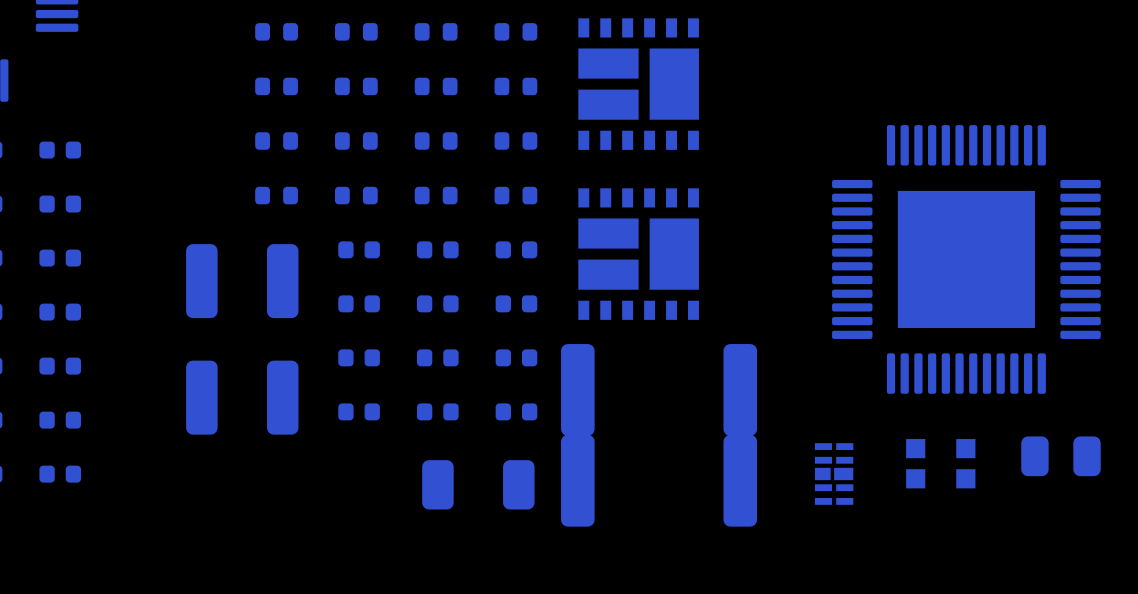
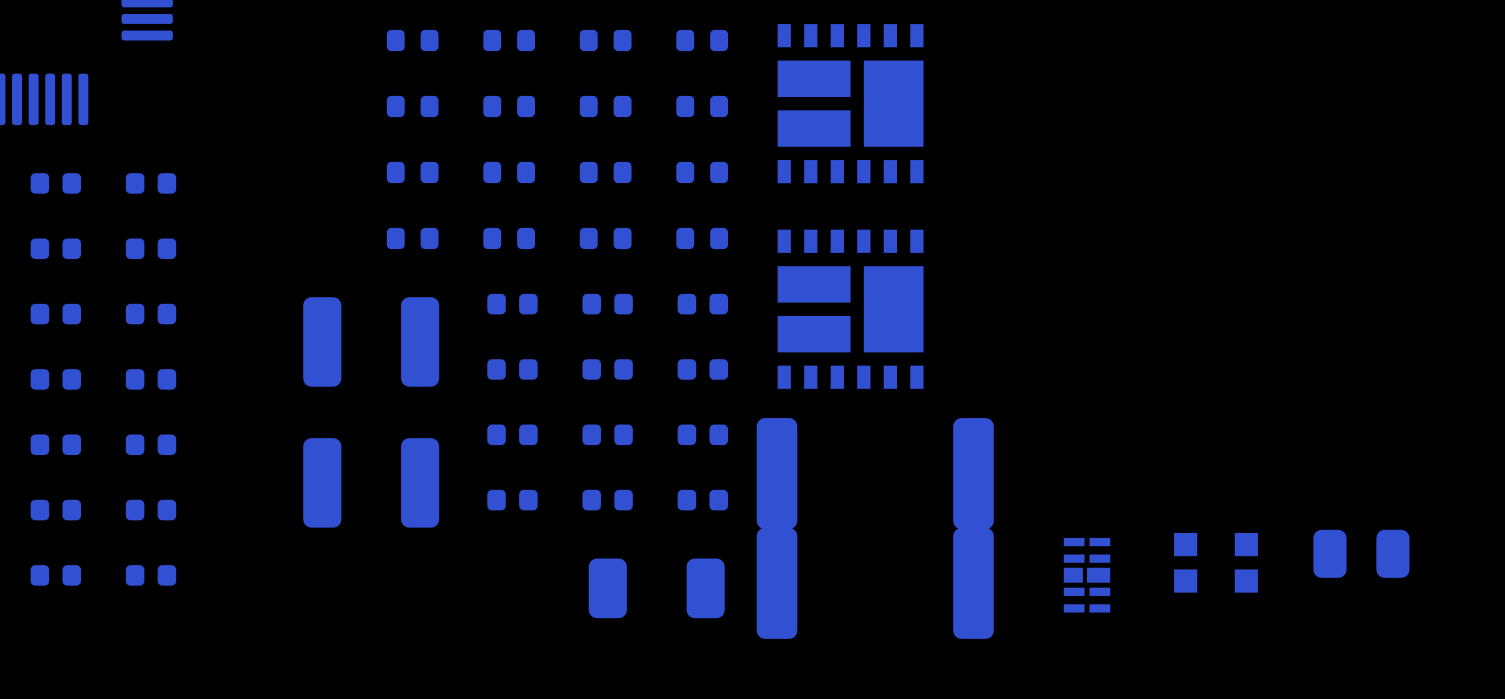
part: (966, 259) -> none

